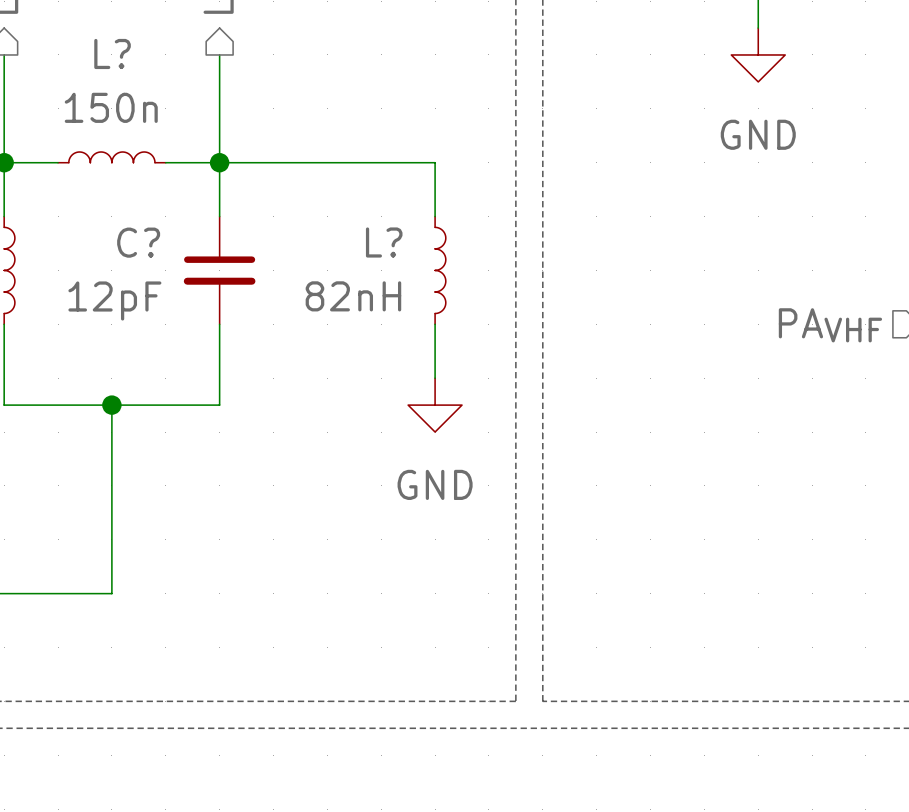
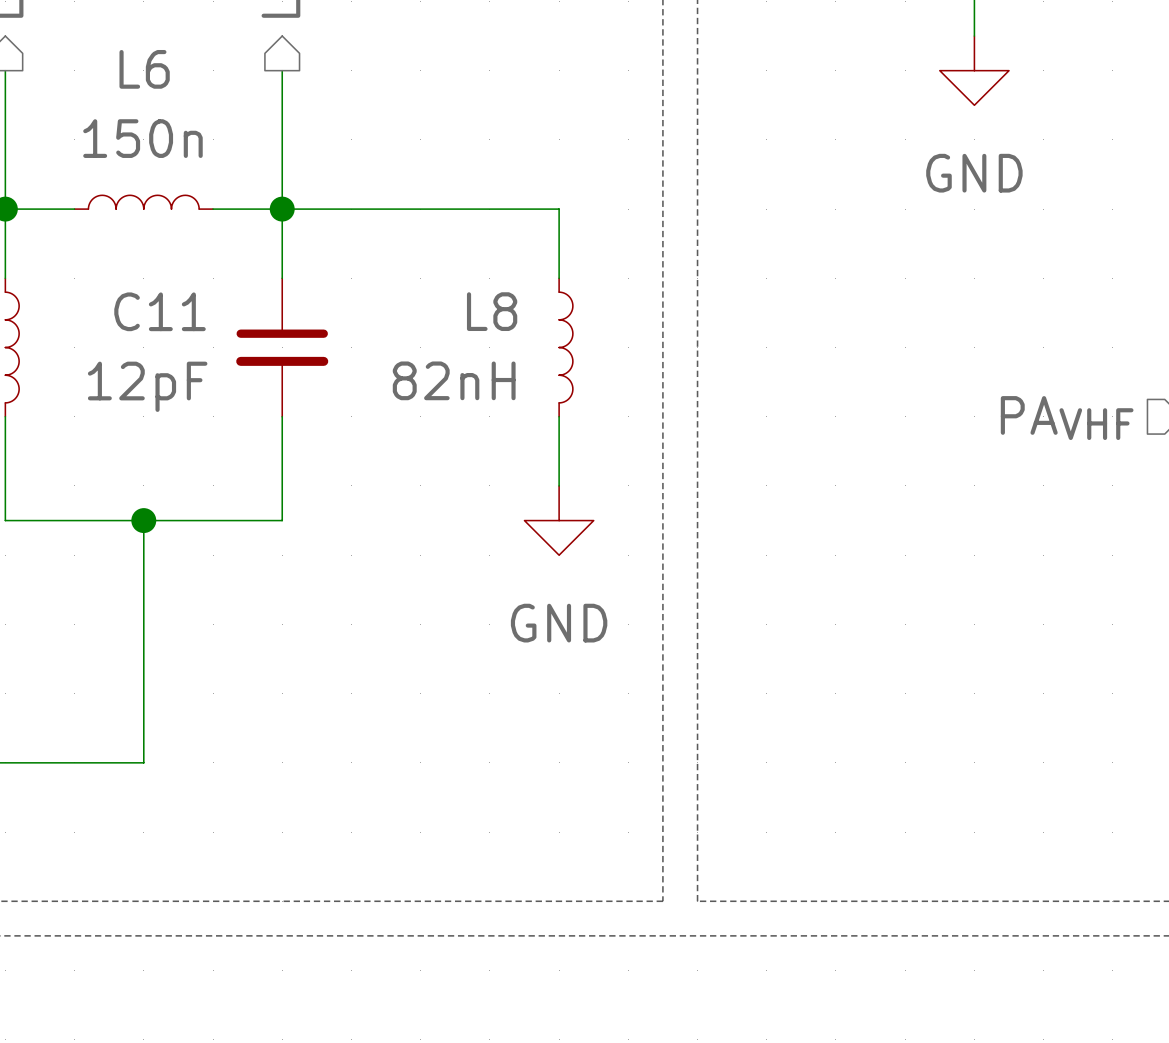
L? name: L? (112, 53) -> L6 (144, 69)
C? name: C? (138, 242) -> C11 (160, 311)
L? name: L? (384, 242) -> L8 (492, 311)

